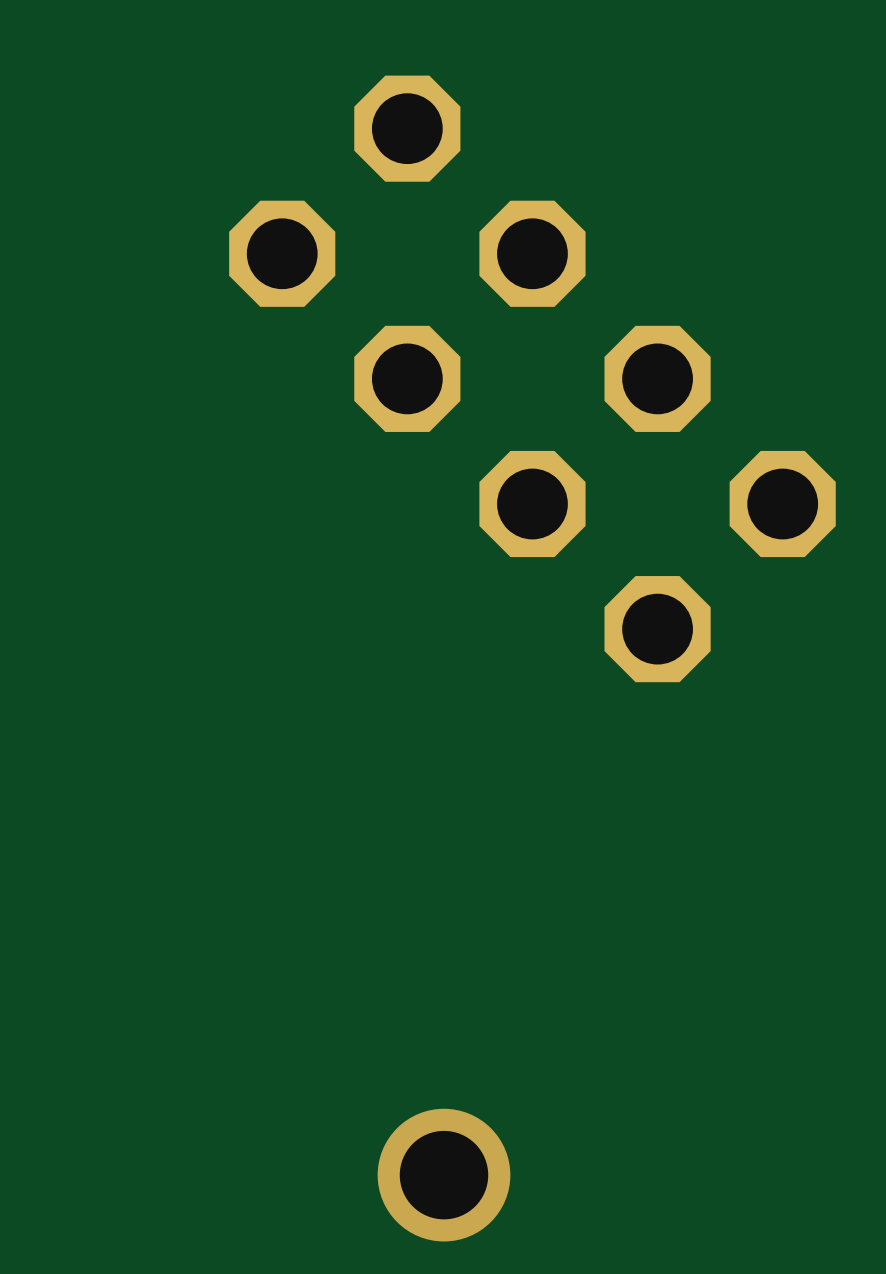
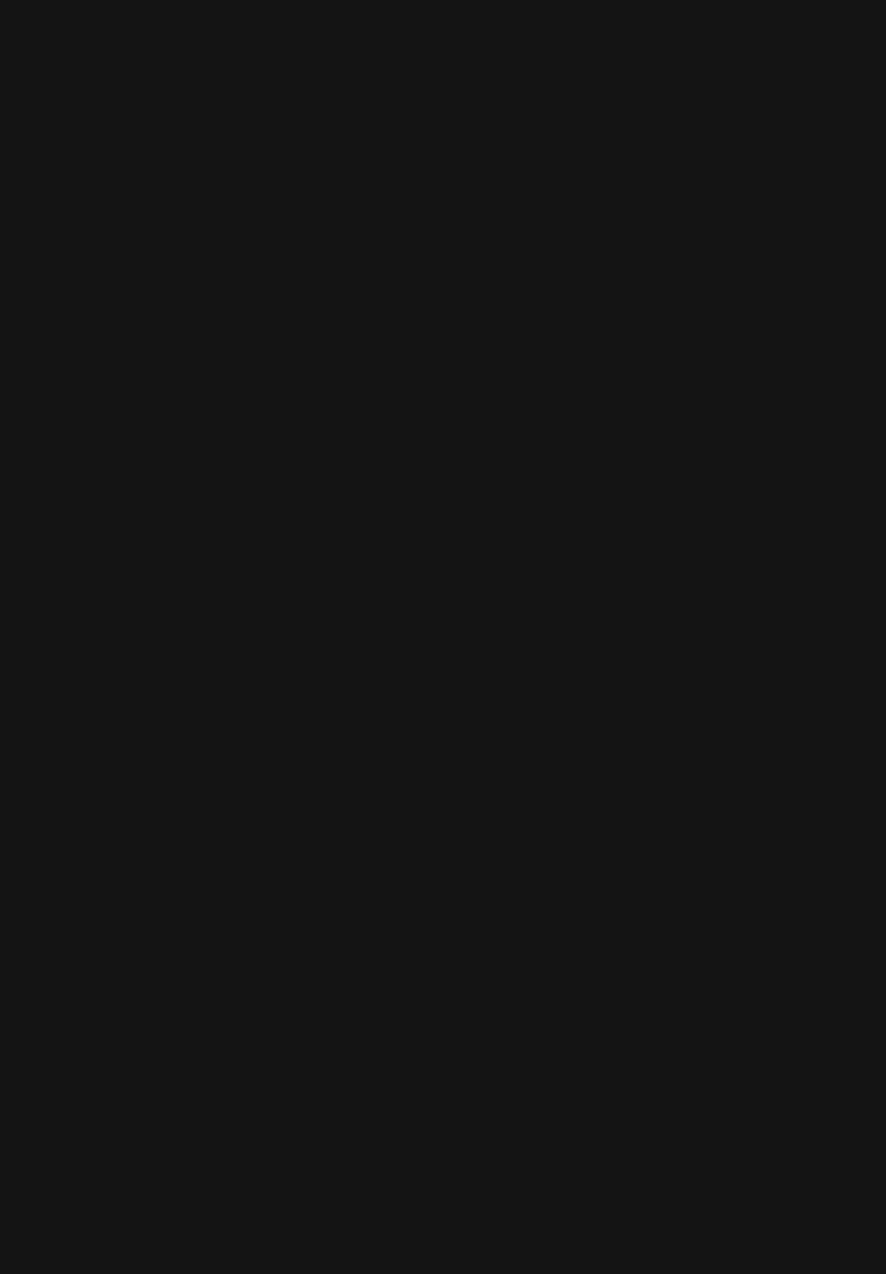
part: (532, 378) -> none
via: (443, 1175) -> none

